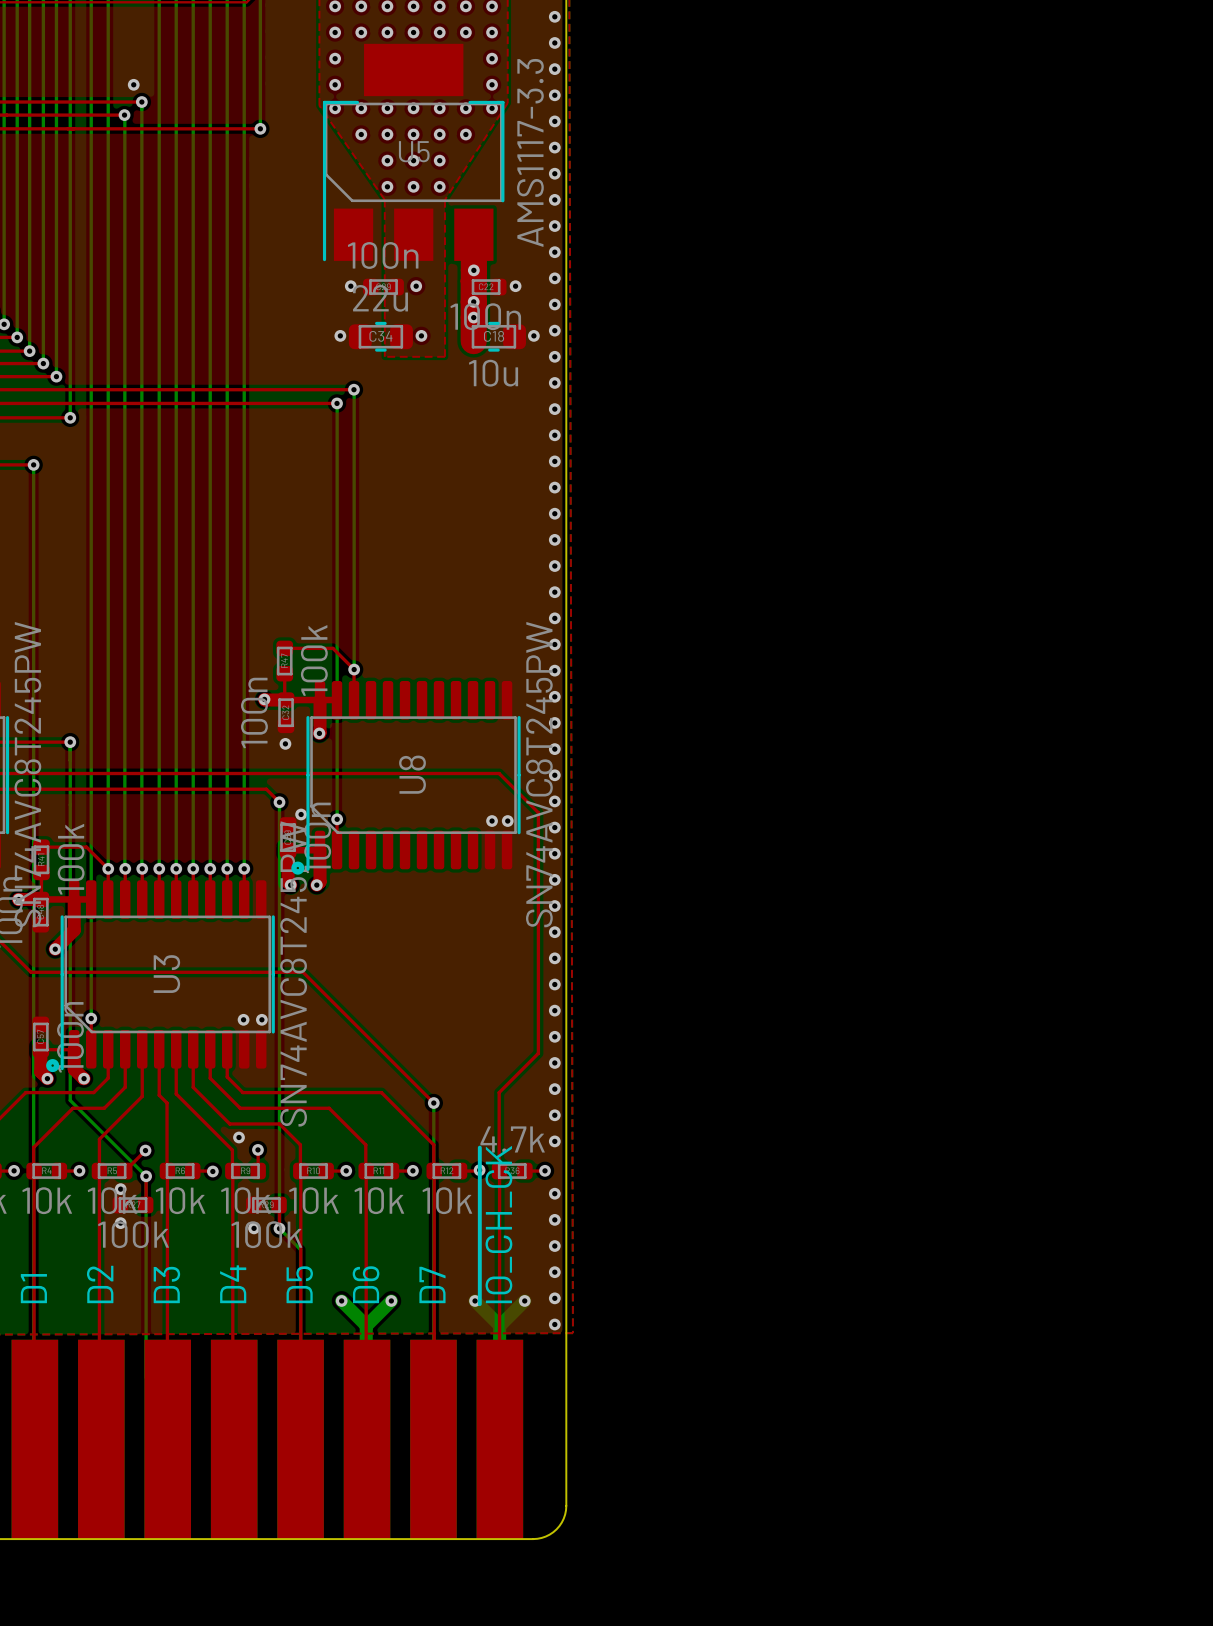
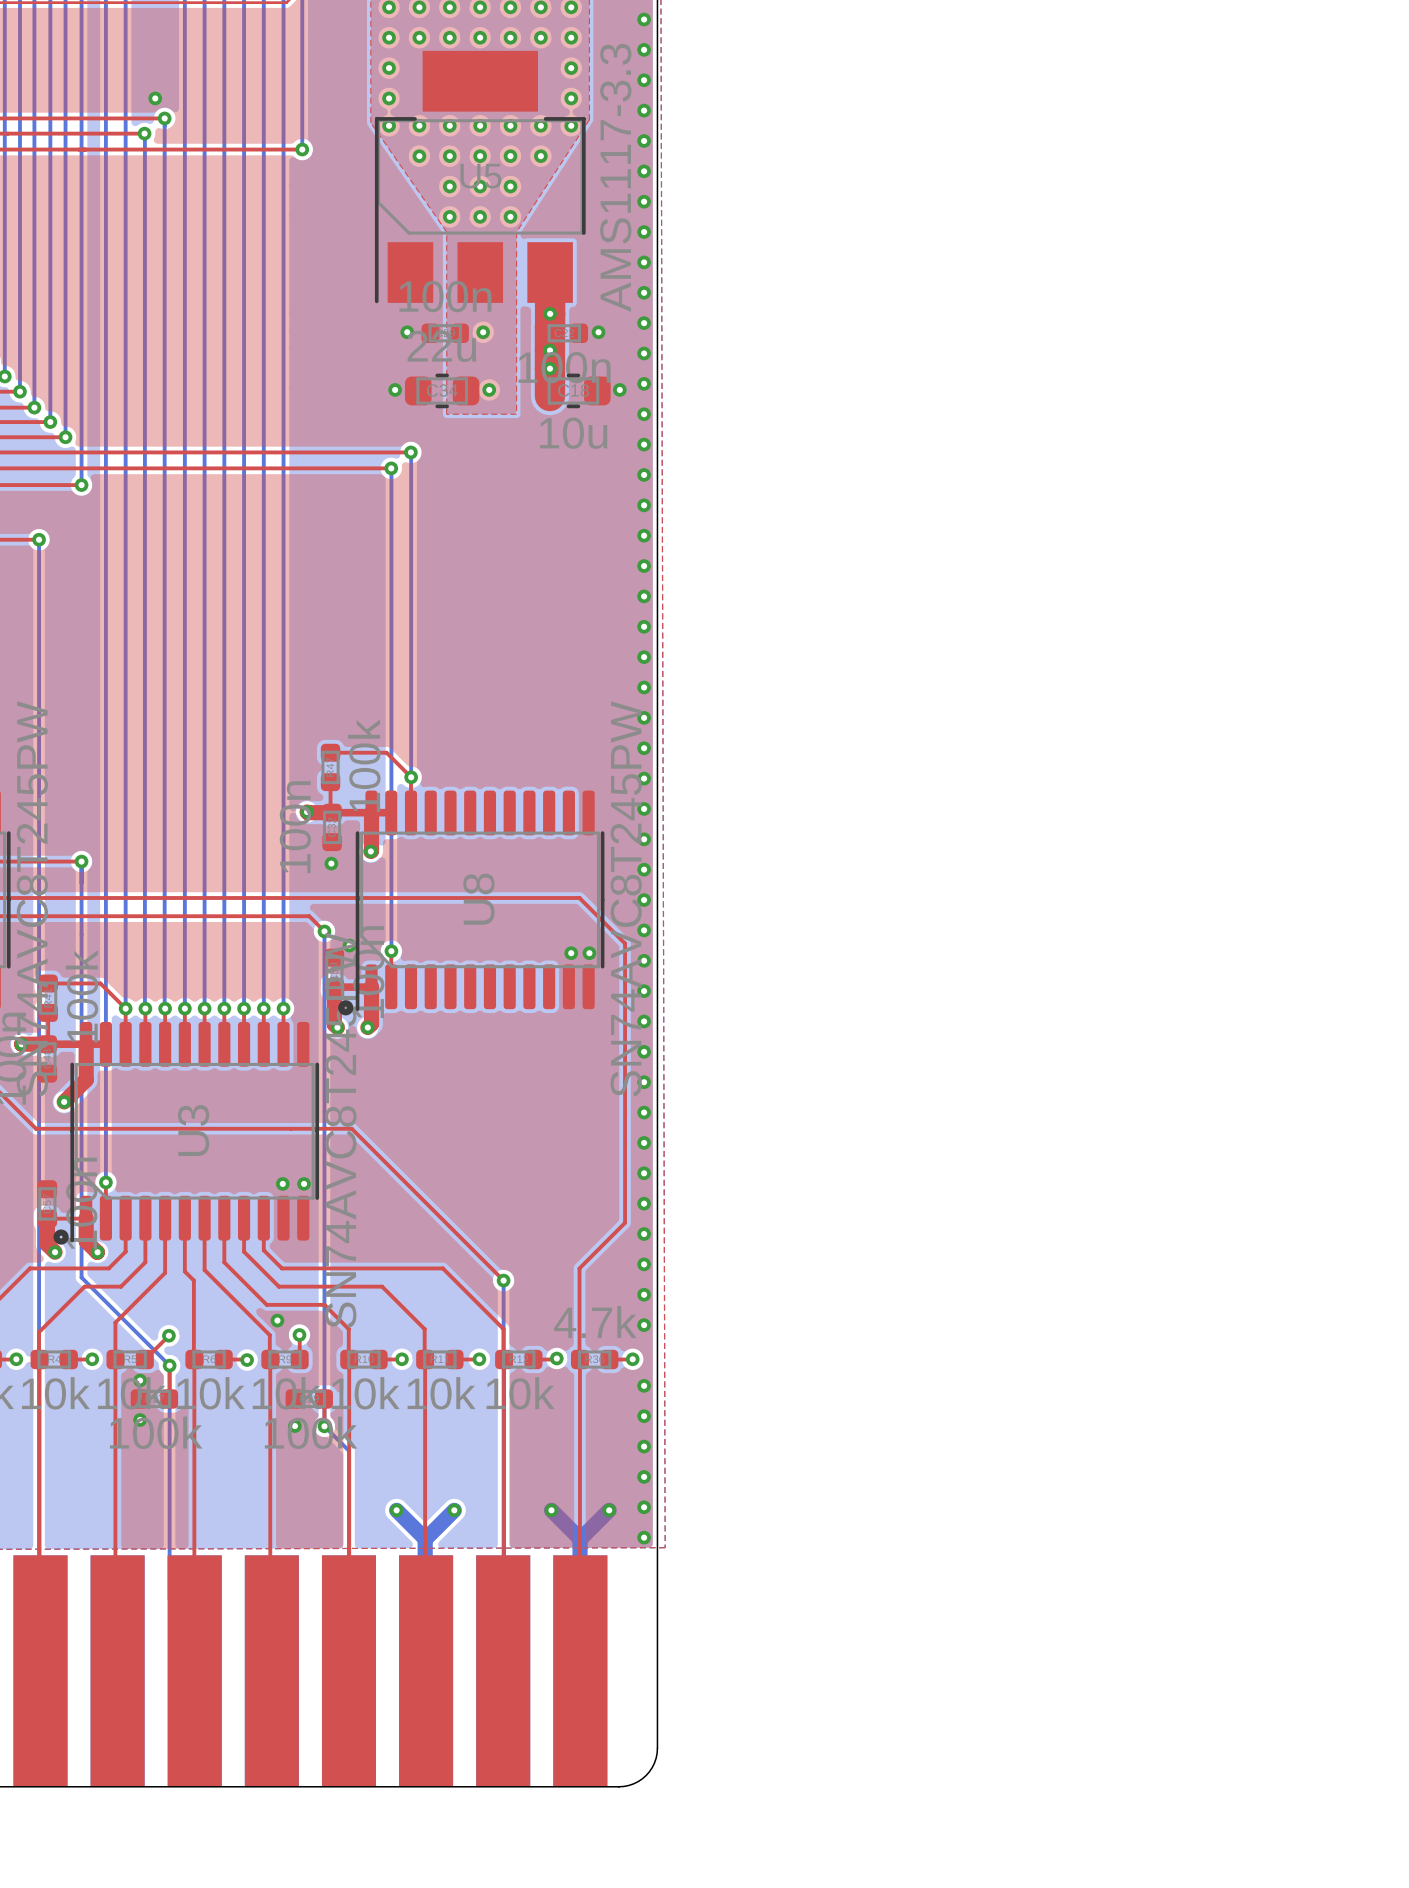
text: ~{IO_CH_CK} (496, 1225) -> none
text: D2 (100, 1284) -> none
text: D4 (233, 1284) -> none
text: D5 (299, 1284) -> none
text: D6 (366, 1284) -> none
text: D7 (432, 1284) -> none
text: D3 (166, 1285) -> none
text: D1 (33, 1288) -> none

